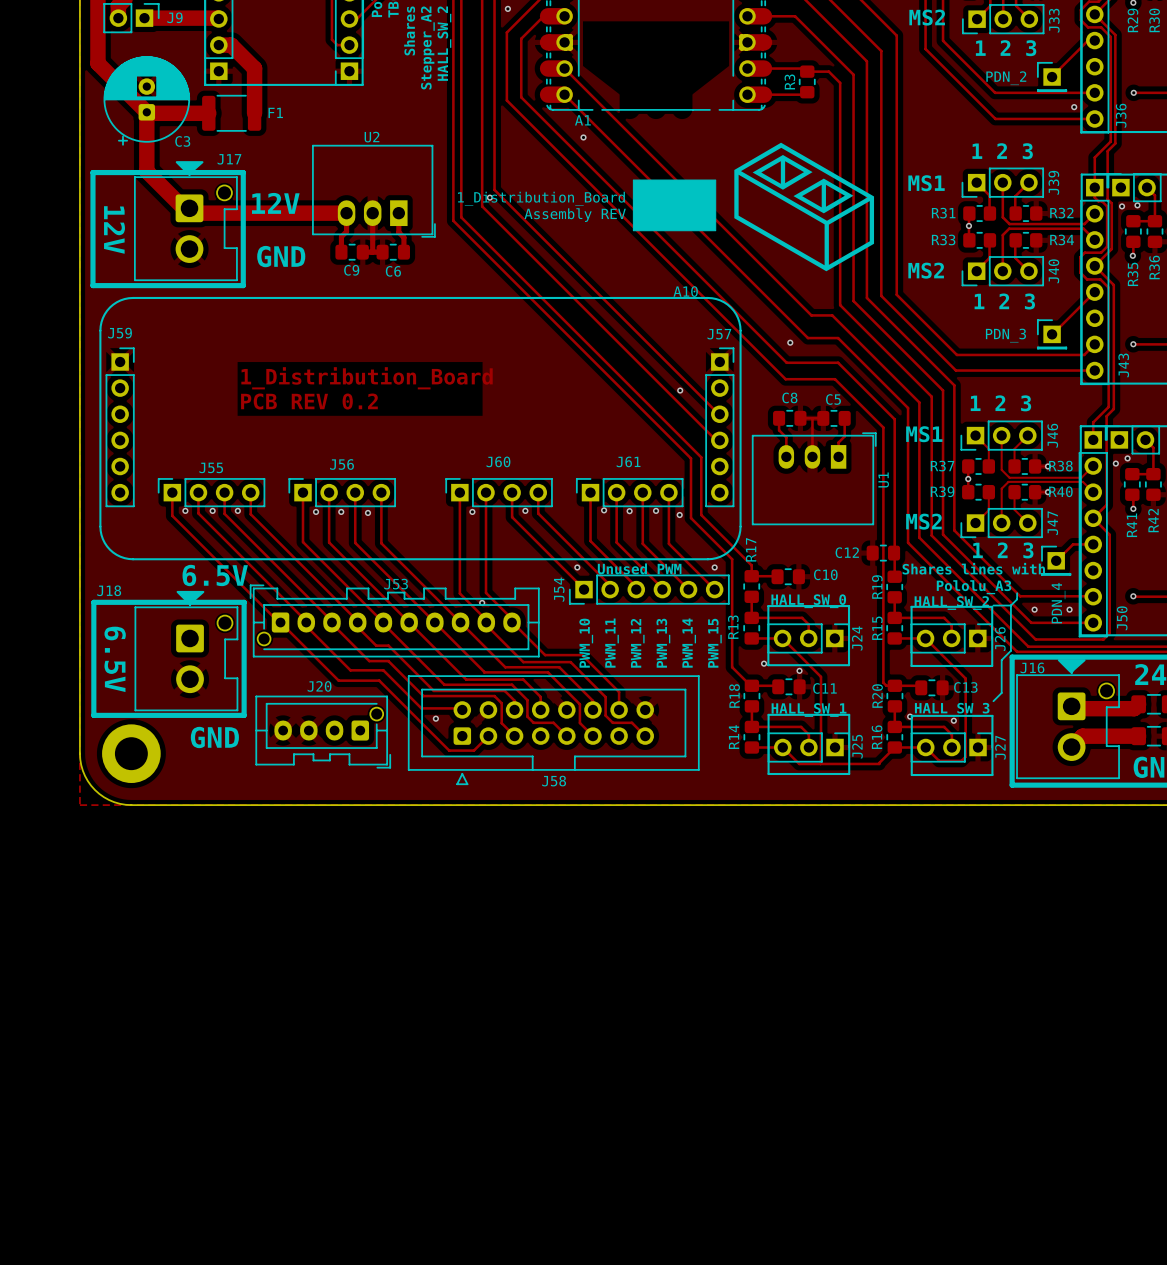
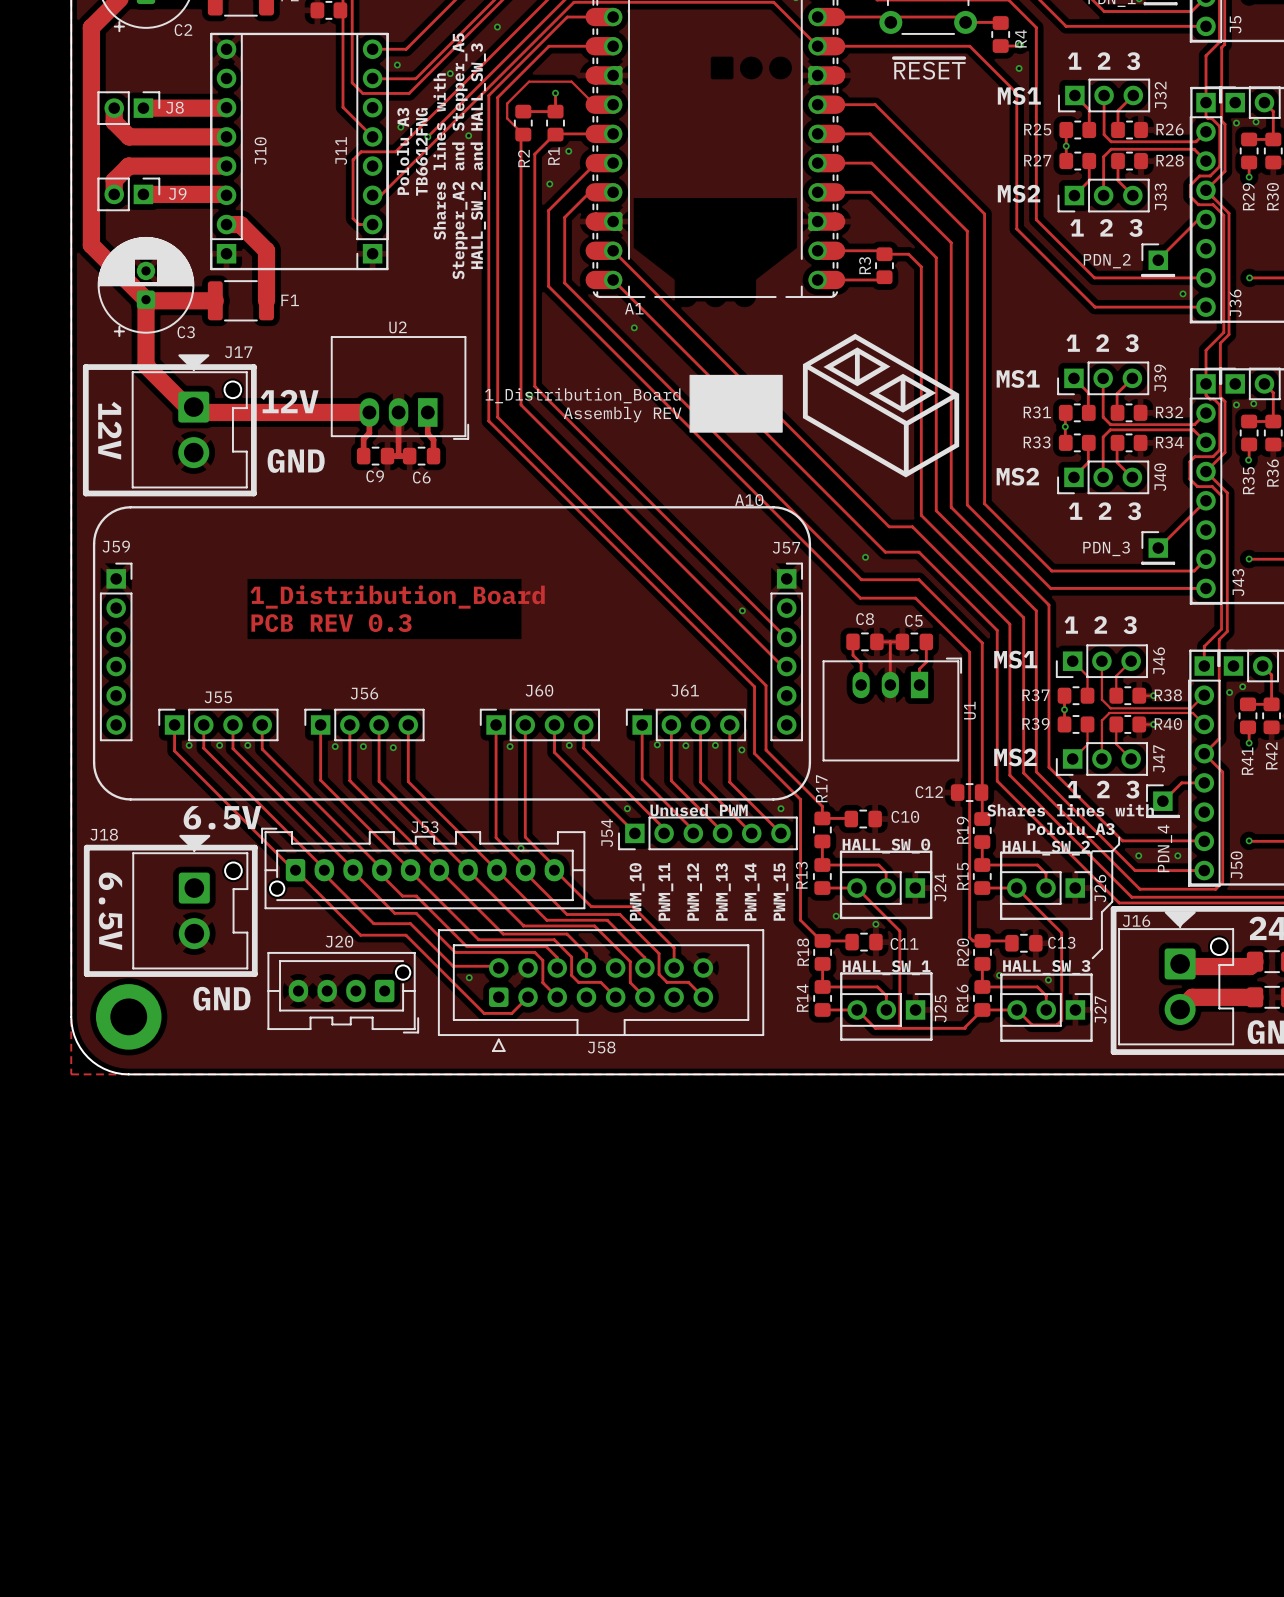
text: PCB REV 0.2 (309, 401) -> PCB REV 0.3 (331, 623)

